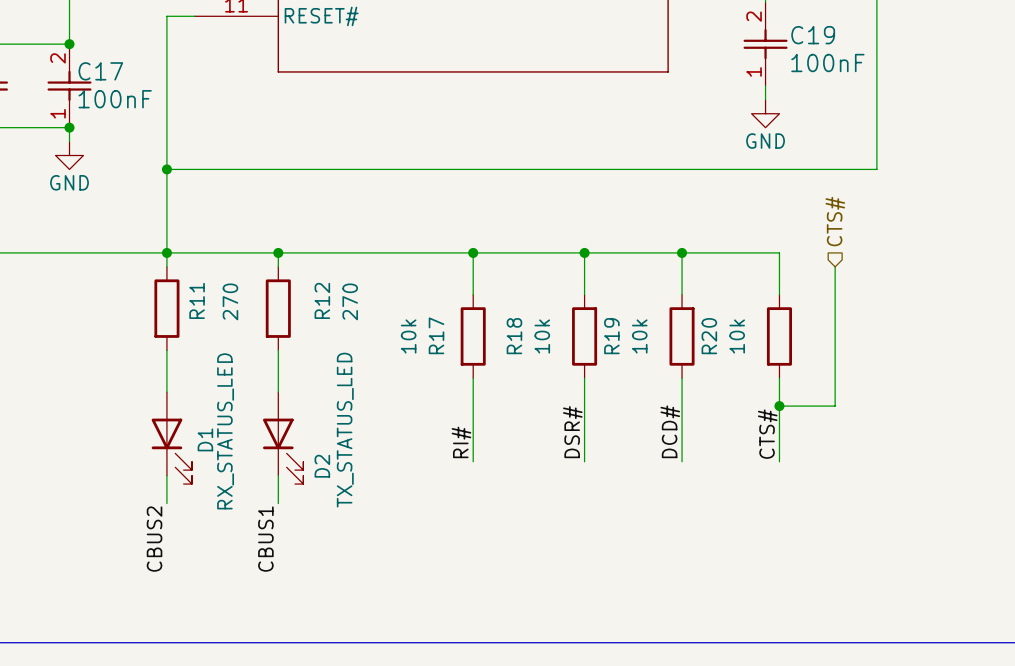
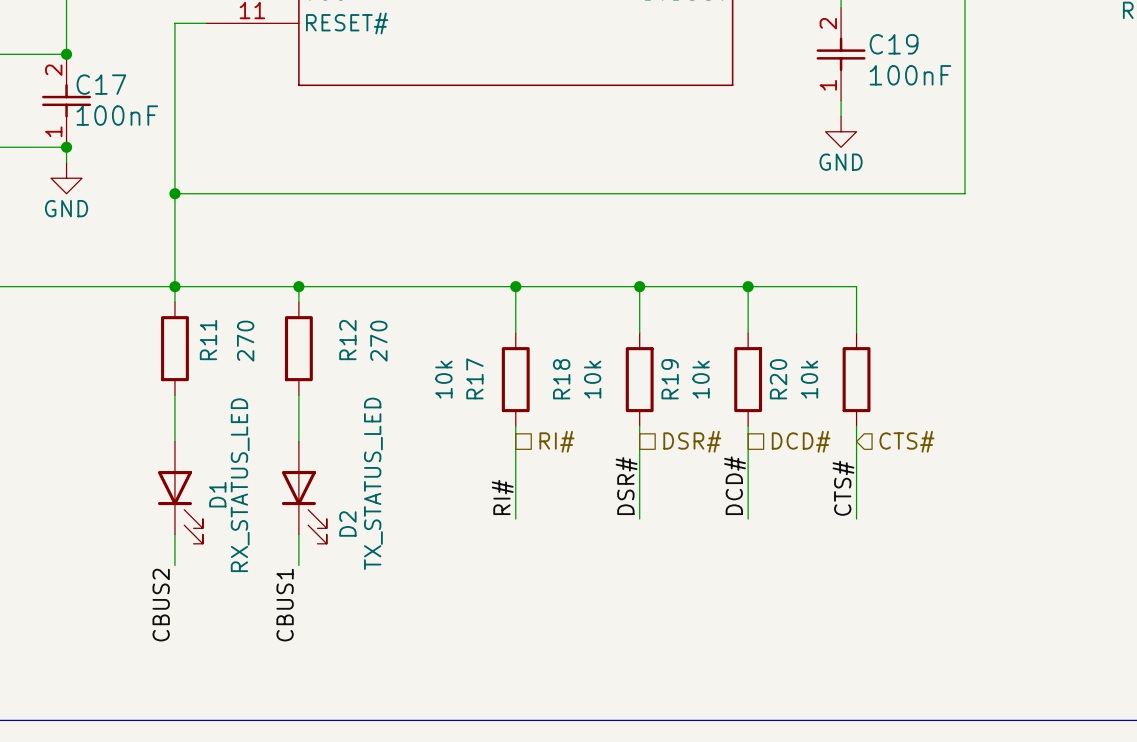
hierarchical label rotation: 0° (835, 221) -> 90° clockwise (906, 441)
hierarchical label position: CTS# (835, 221) -> CTS# (906, 441)
wire: (835, 266) (835, 406) (779, 406) -> none
hierarchical label: none -> RI# (556, 441)
hierarchical label: none -> DSR# (692, 441)
hierarchical label: none -> DCD# (801, 441)
junction: (779, 406) -> none

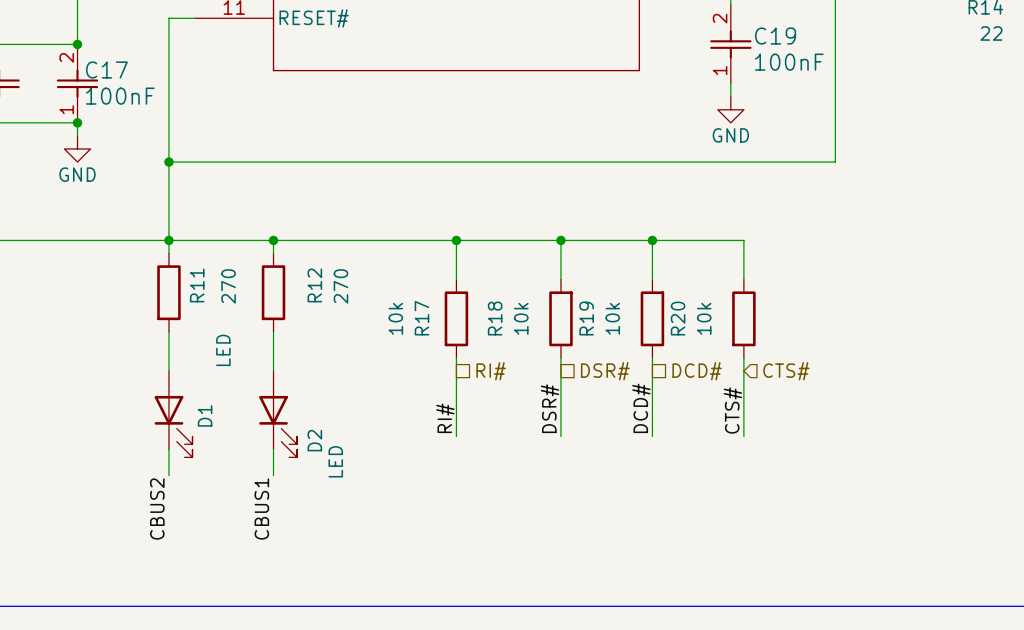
D2 value: TX_STATUS_LED (373, 483) -> LED (335, 461)
D1 value: RX_STATUS_LED (240, 485) -> LED (223, 350)

